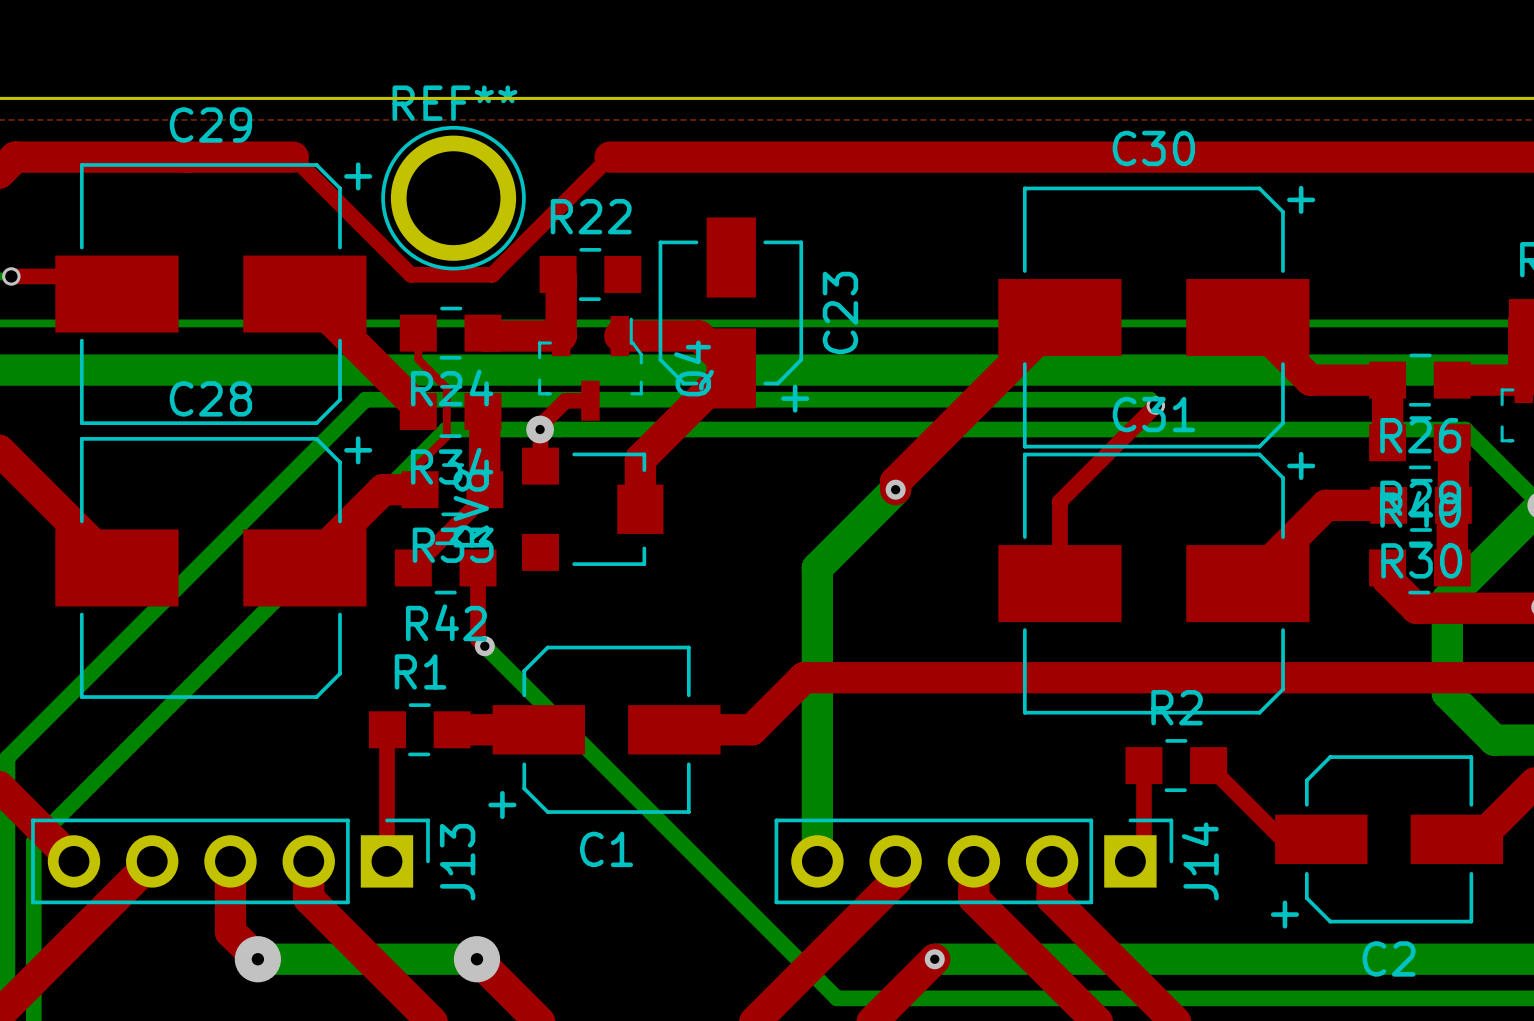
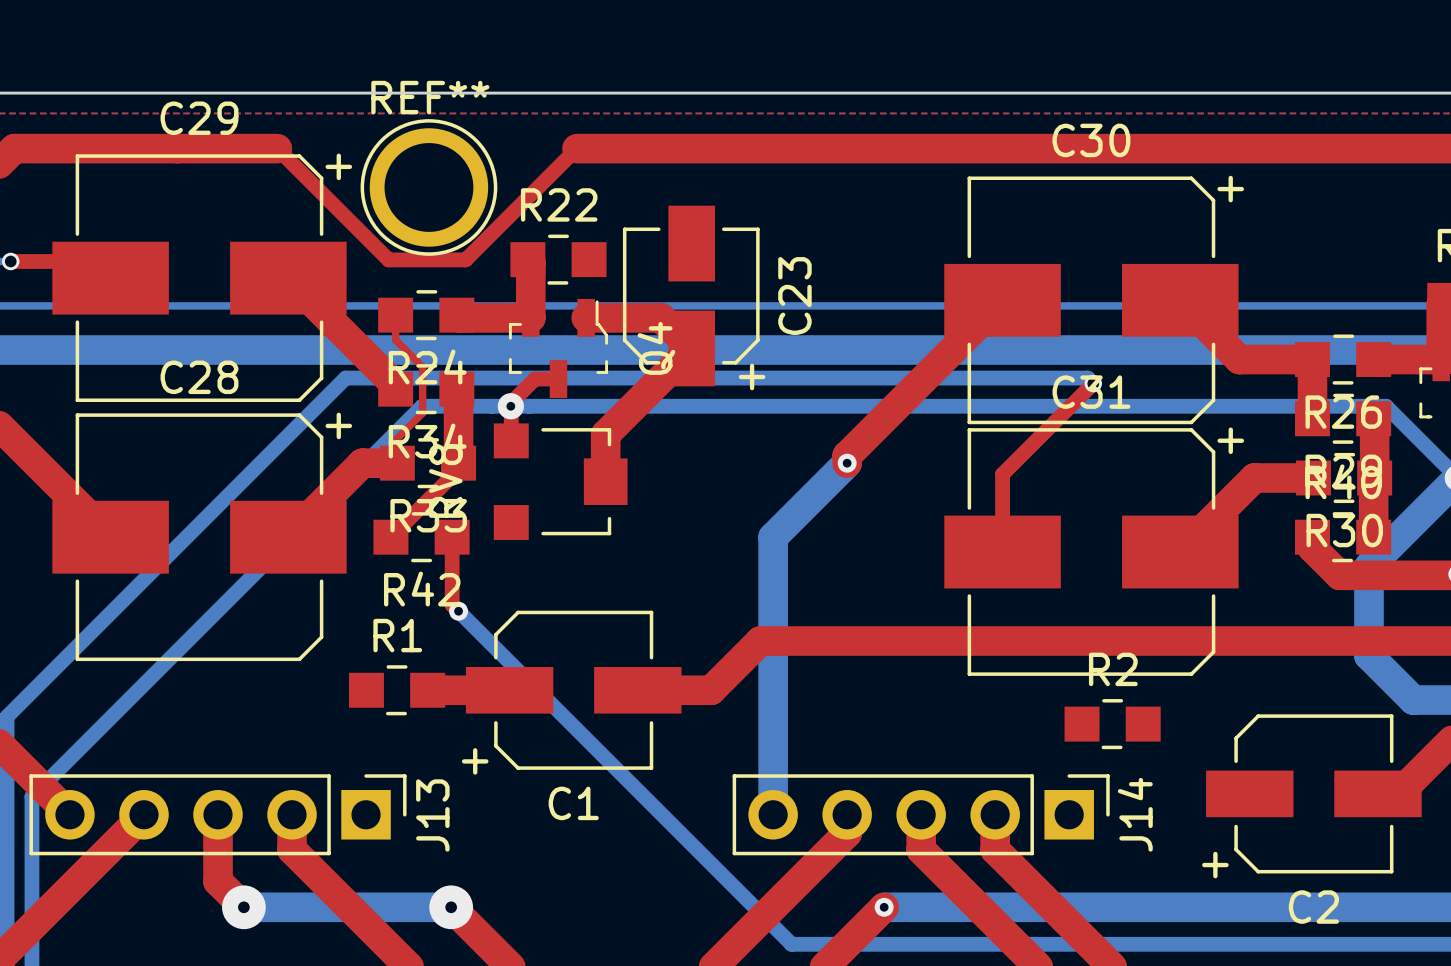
top track: (387, 729) (386, 861) -> none
top track: (1143, 765) (1143, 847) (1130, 861) -> none
top track: (1208, 765) (1282, 839) (1321, 839) -> none

